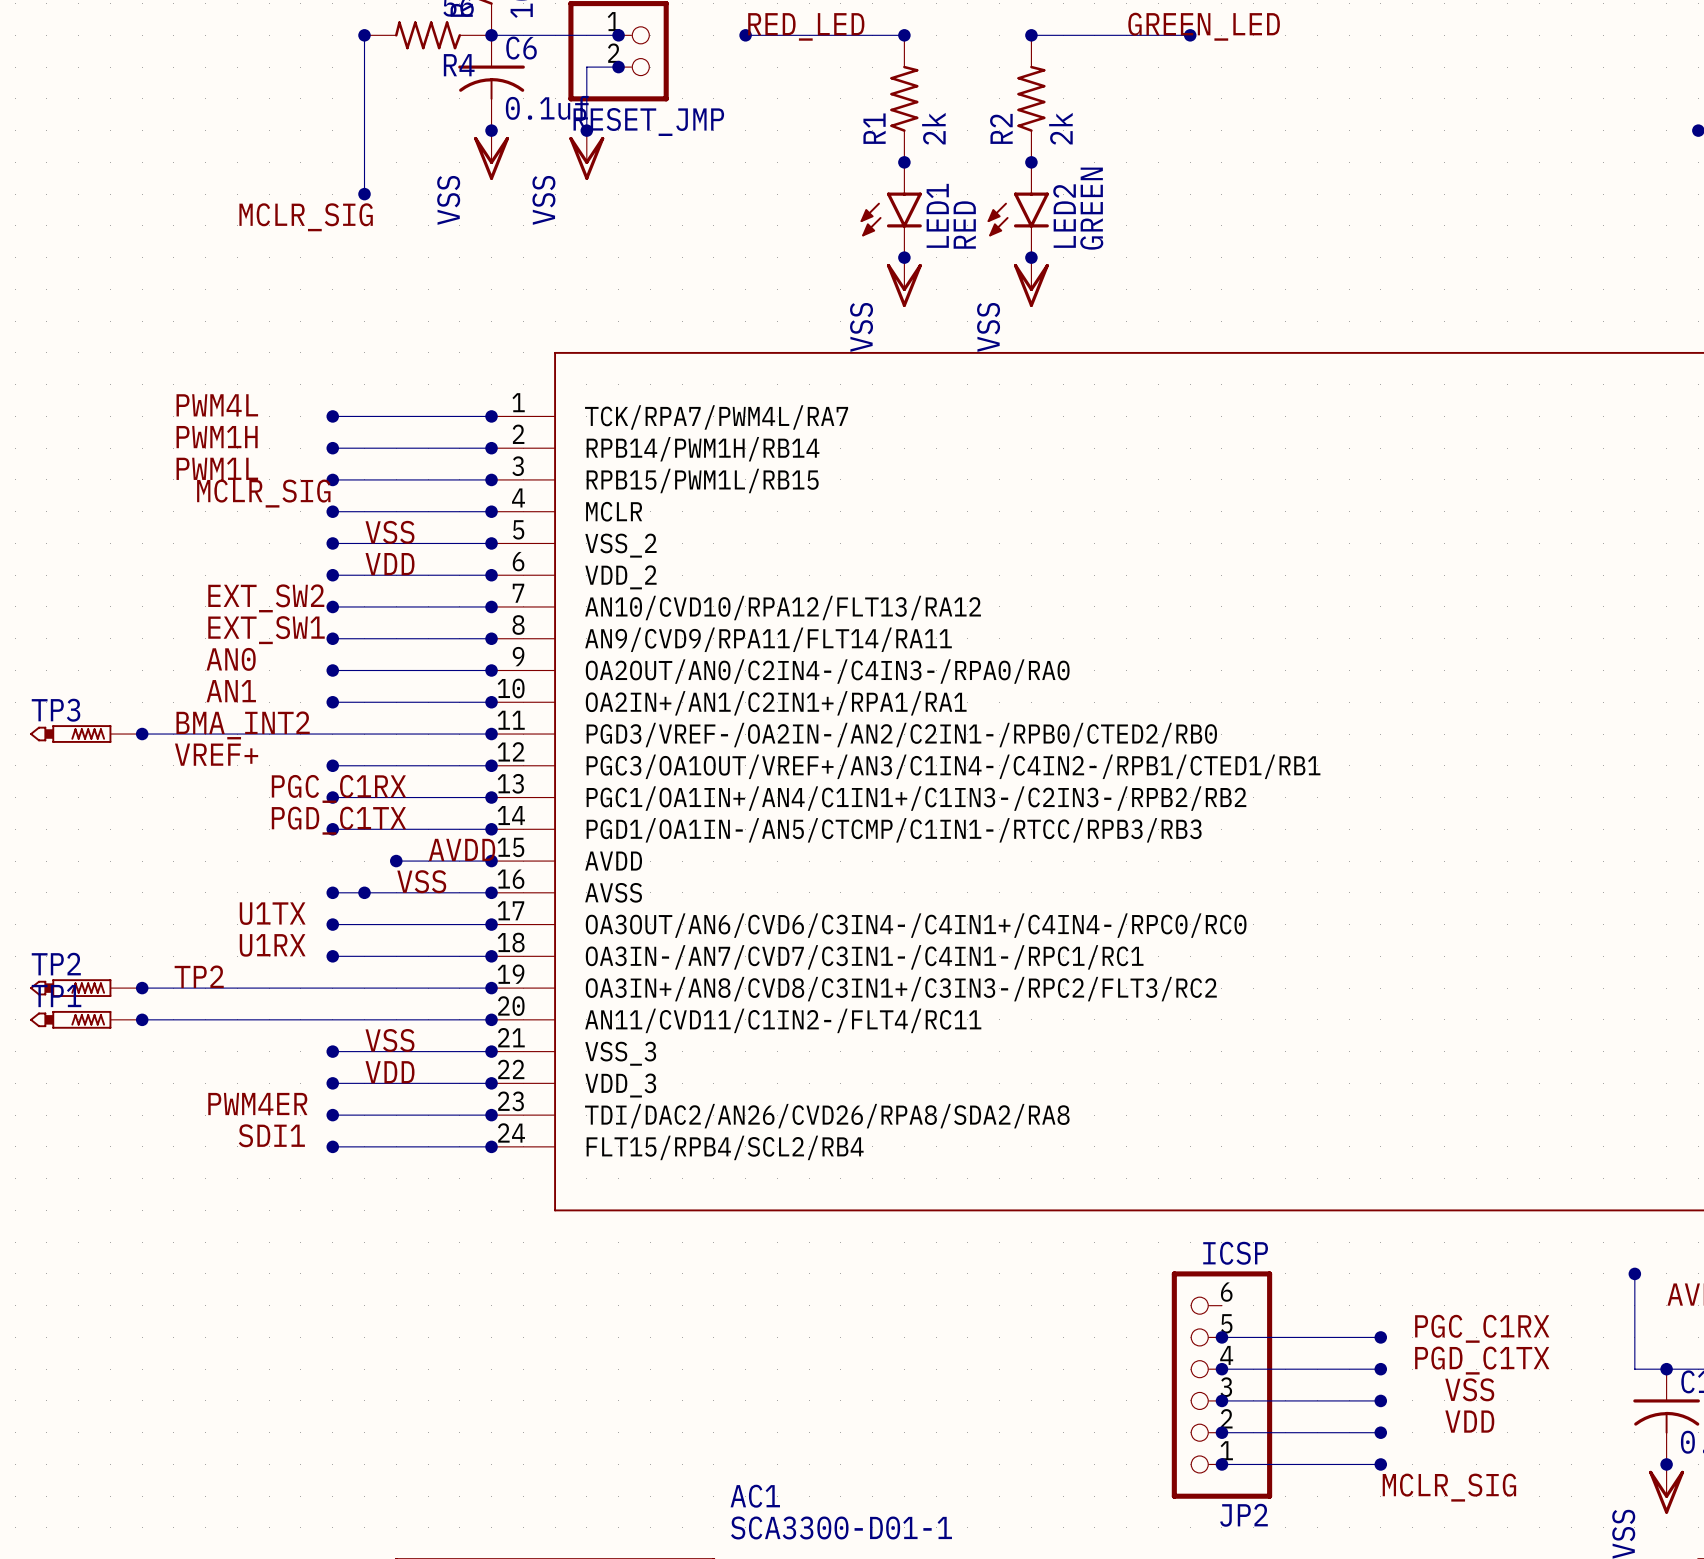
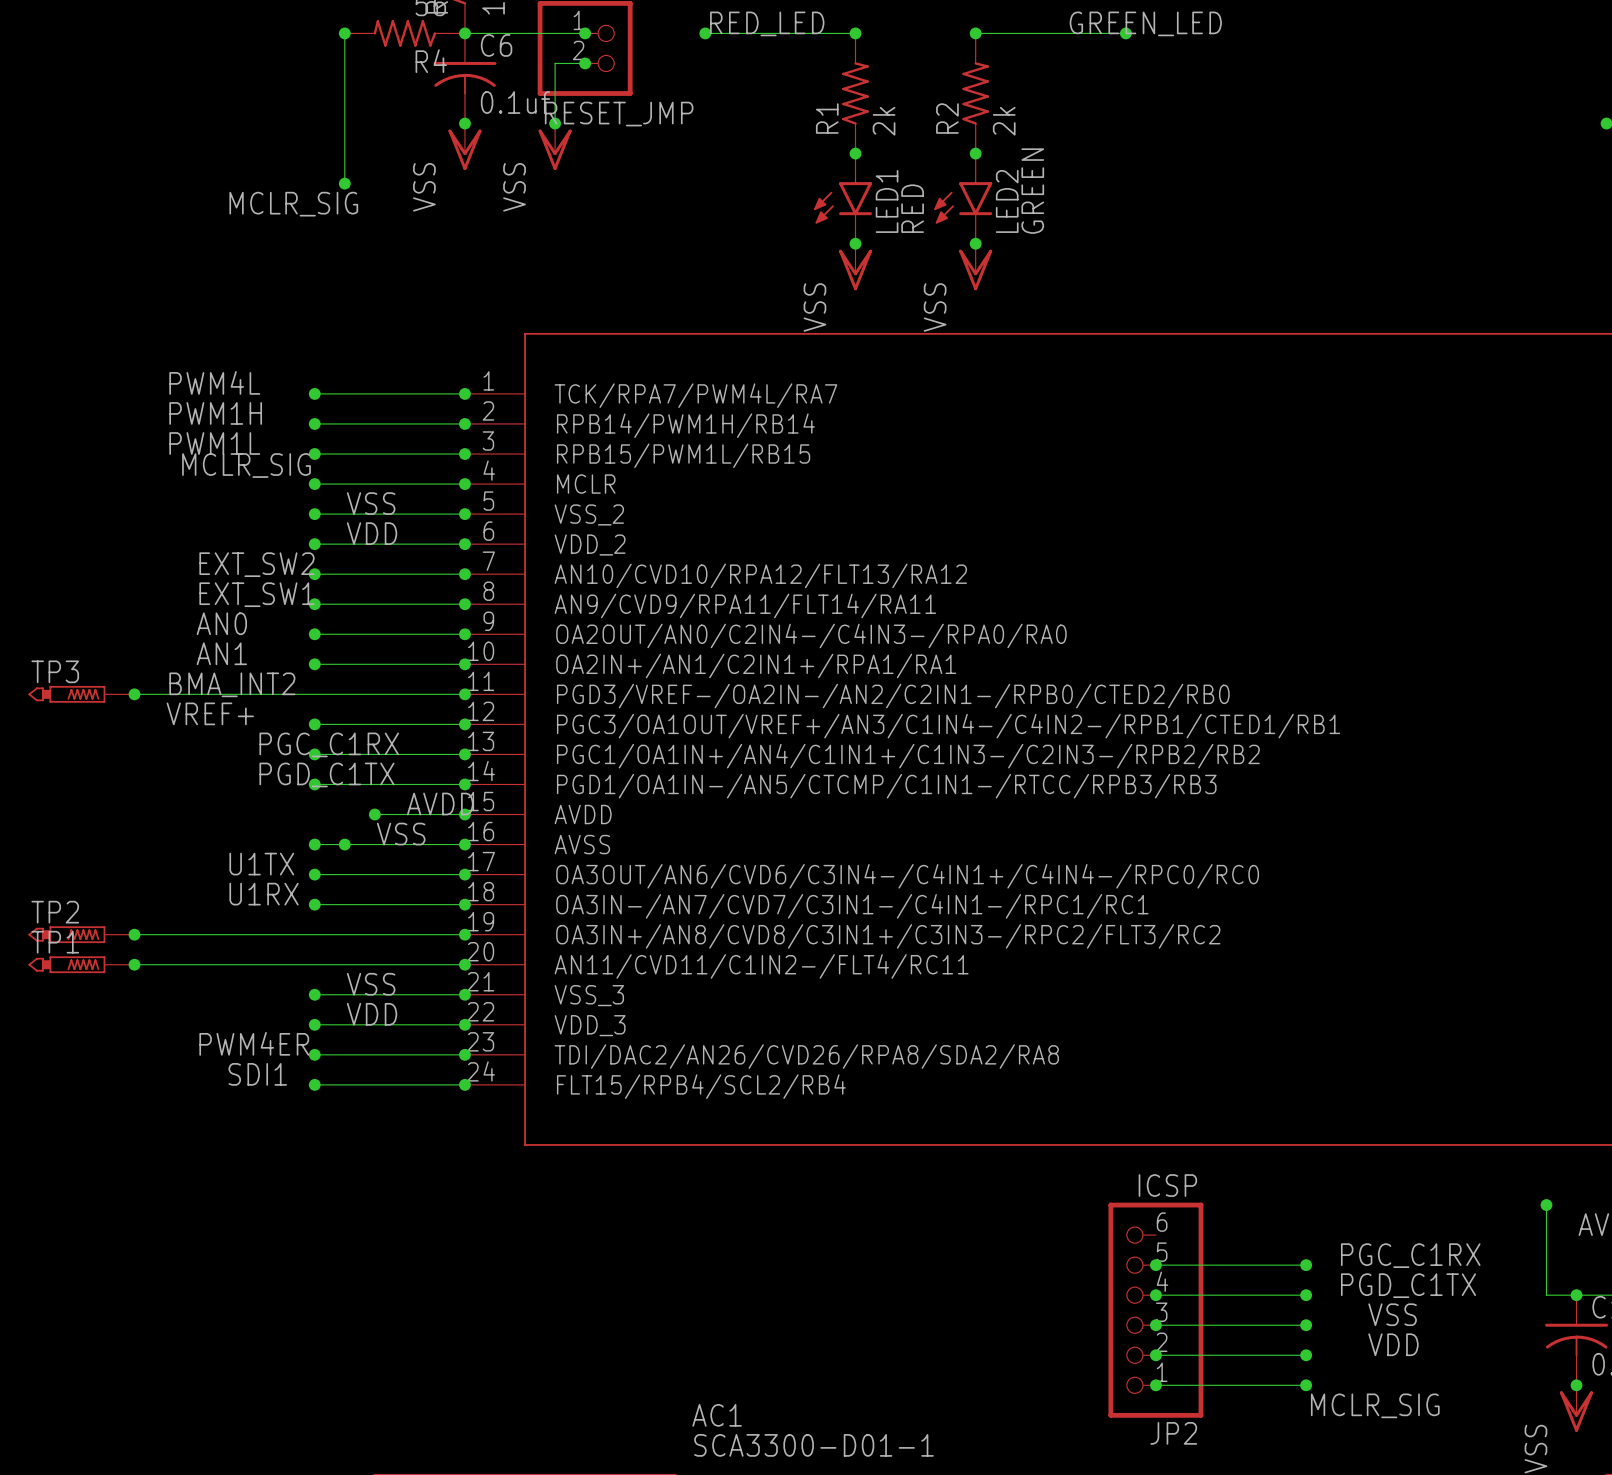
label: TP2 (199, 976) -> none

